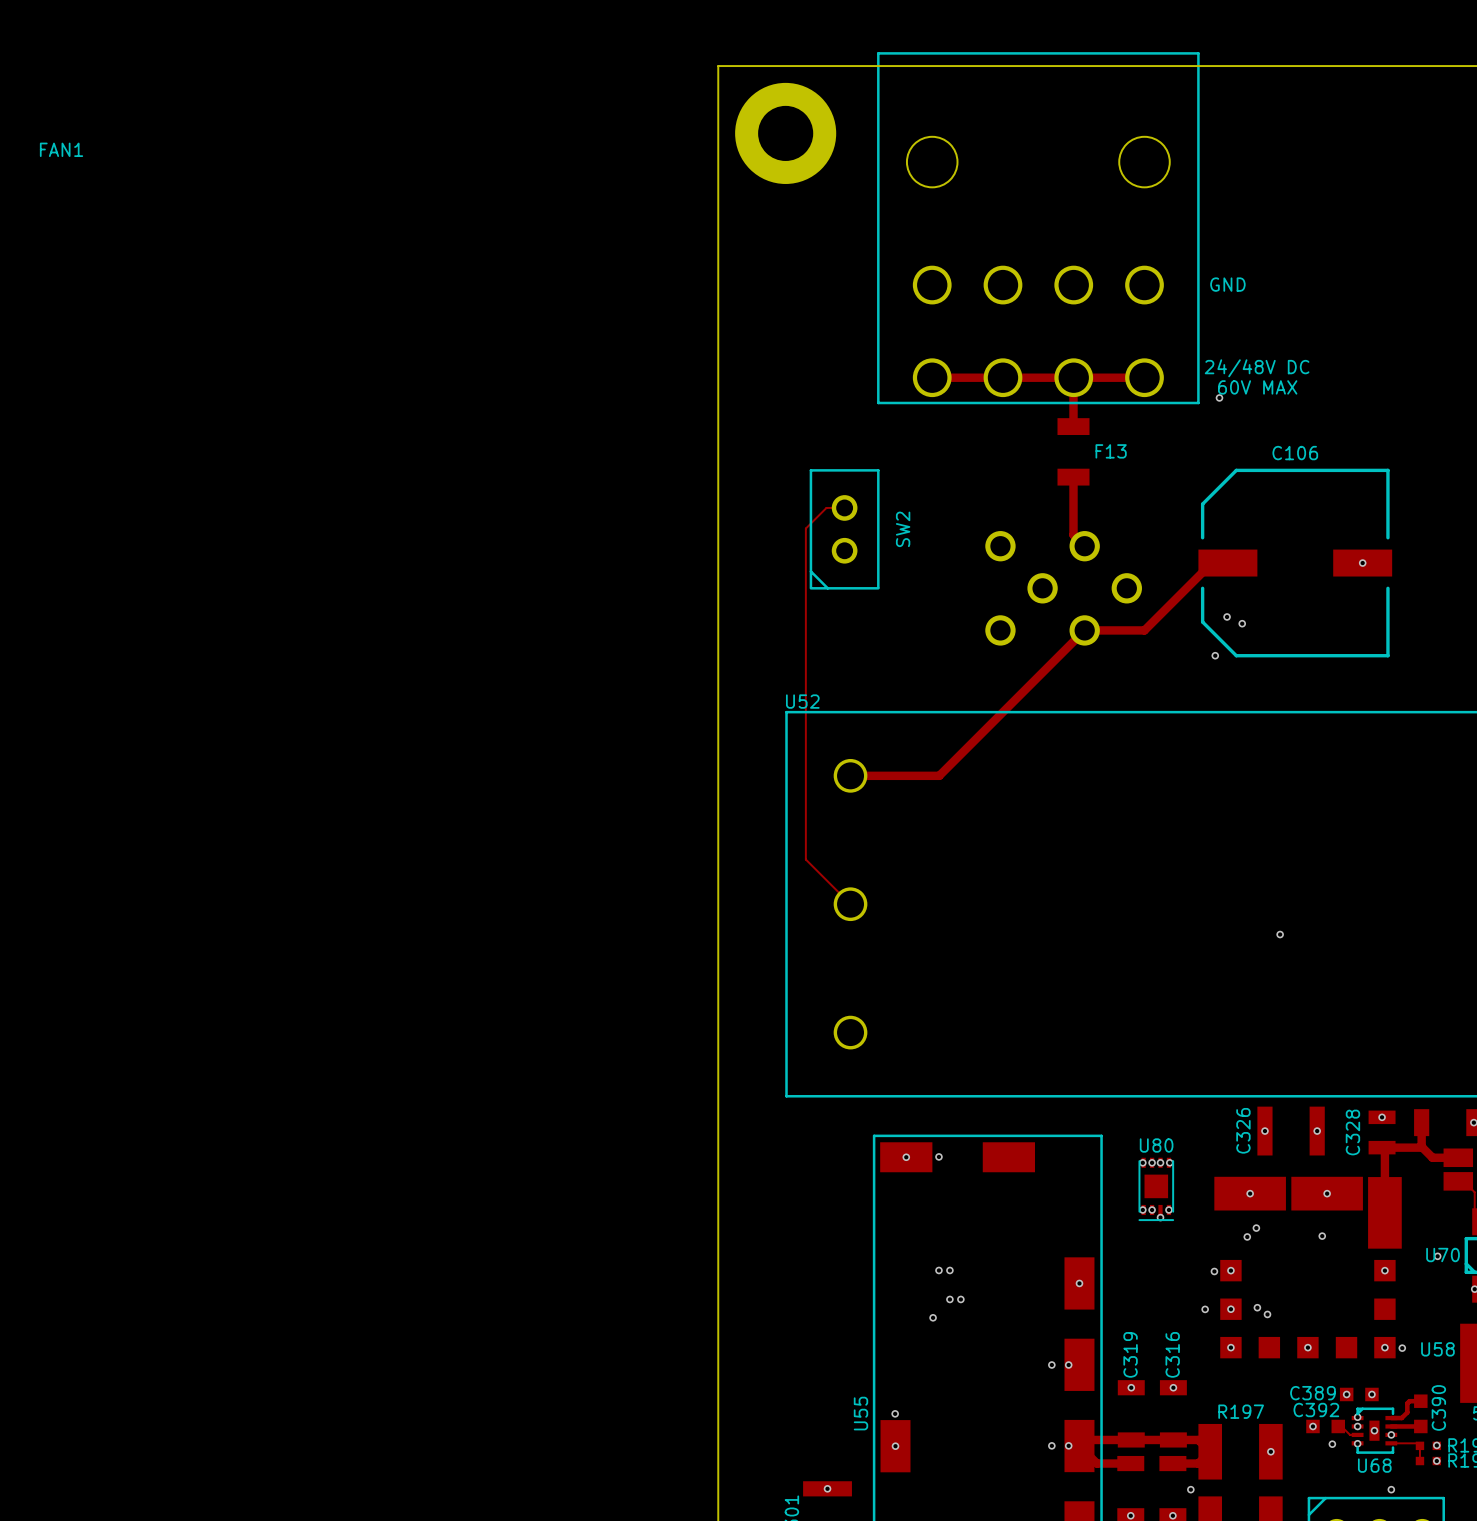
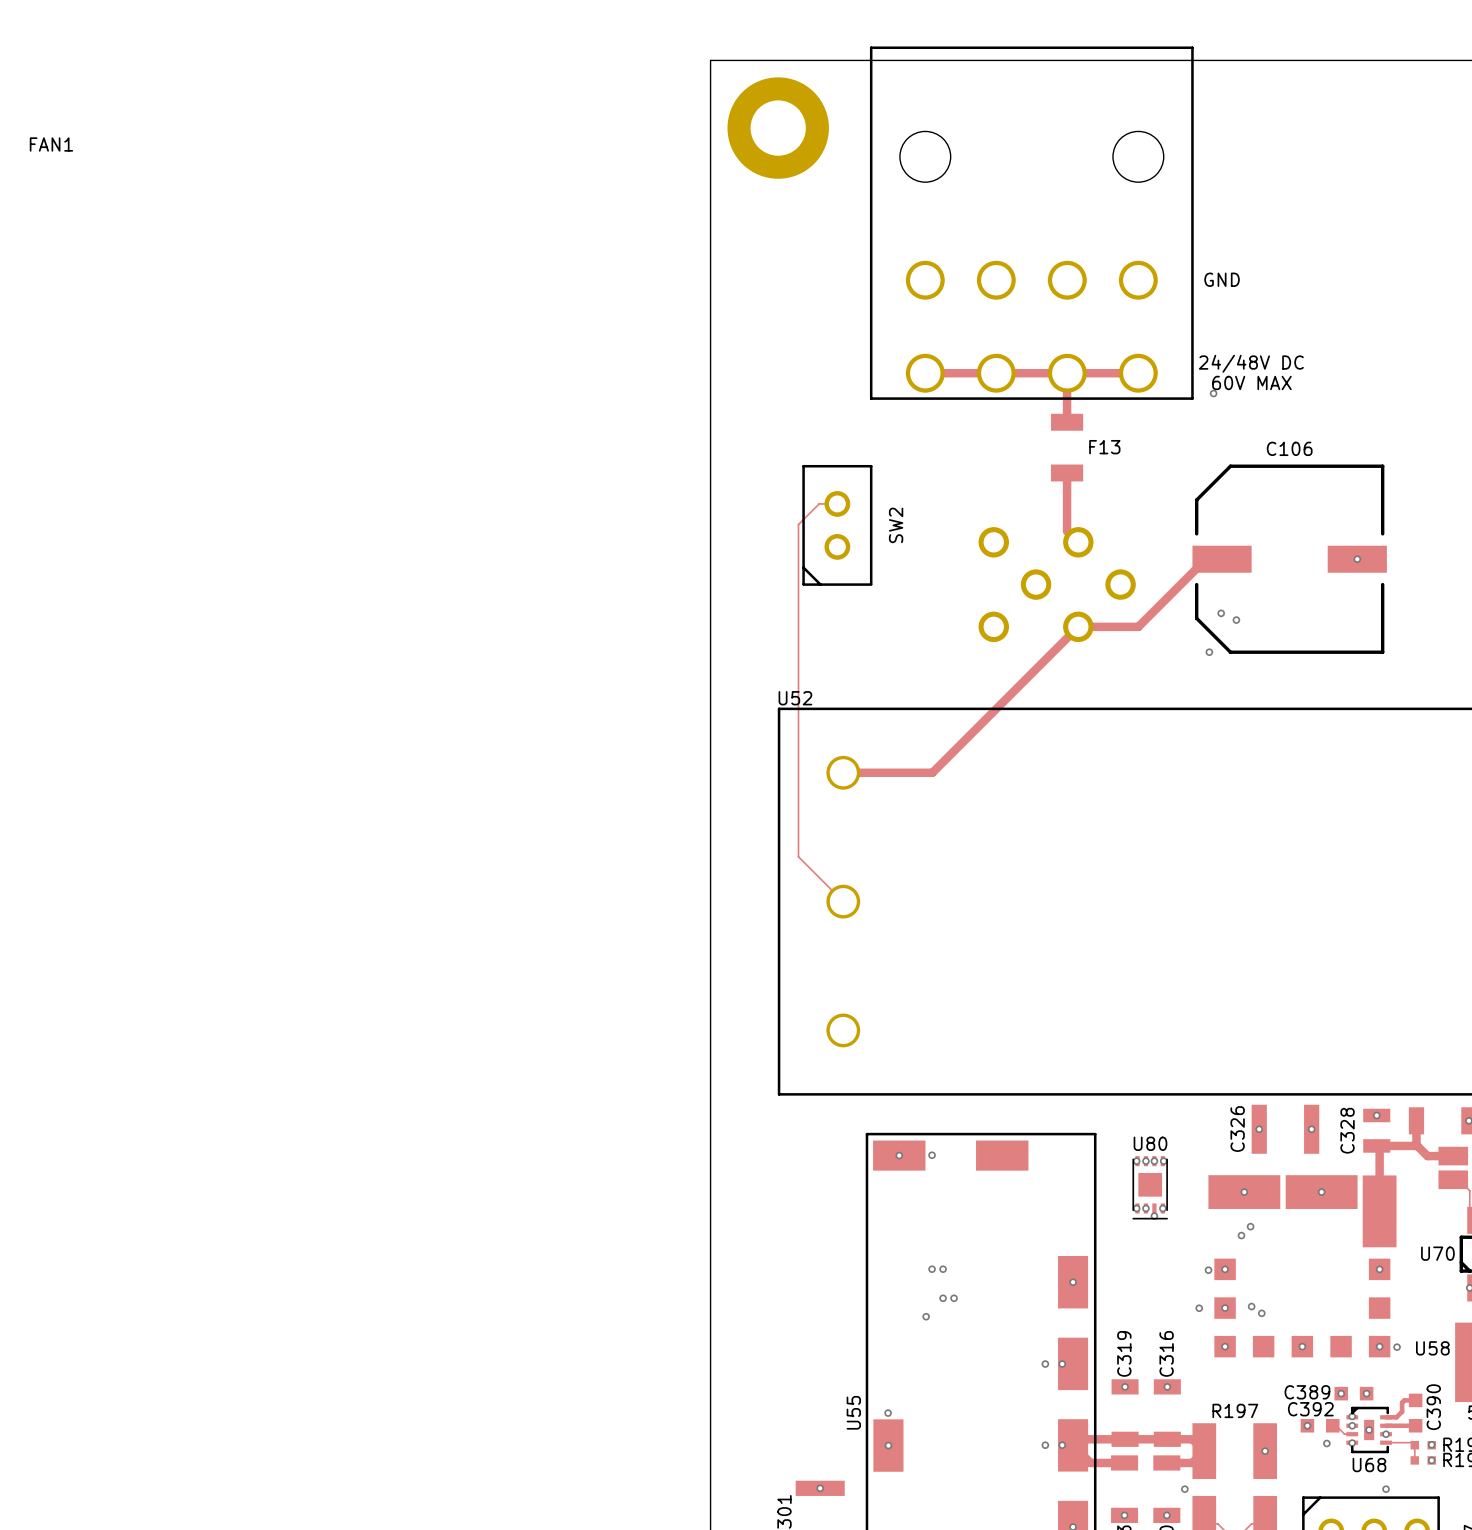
via: (1280, 934) -> none
via: (1322, 1236) -> none
via: (1437, 1256) -> none

